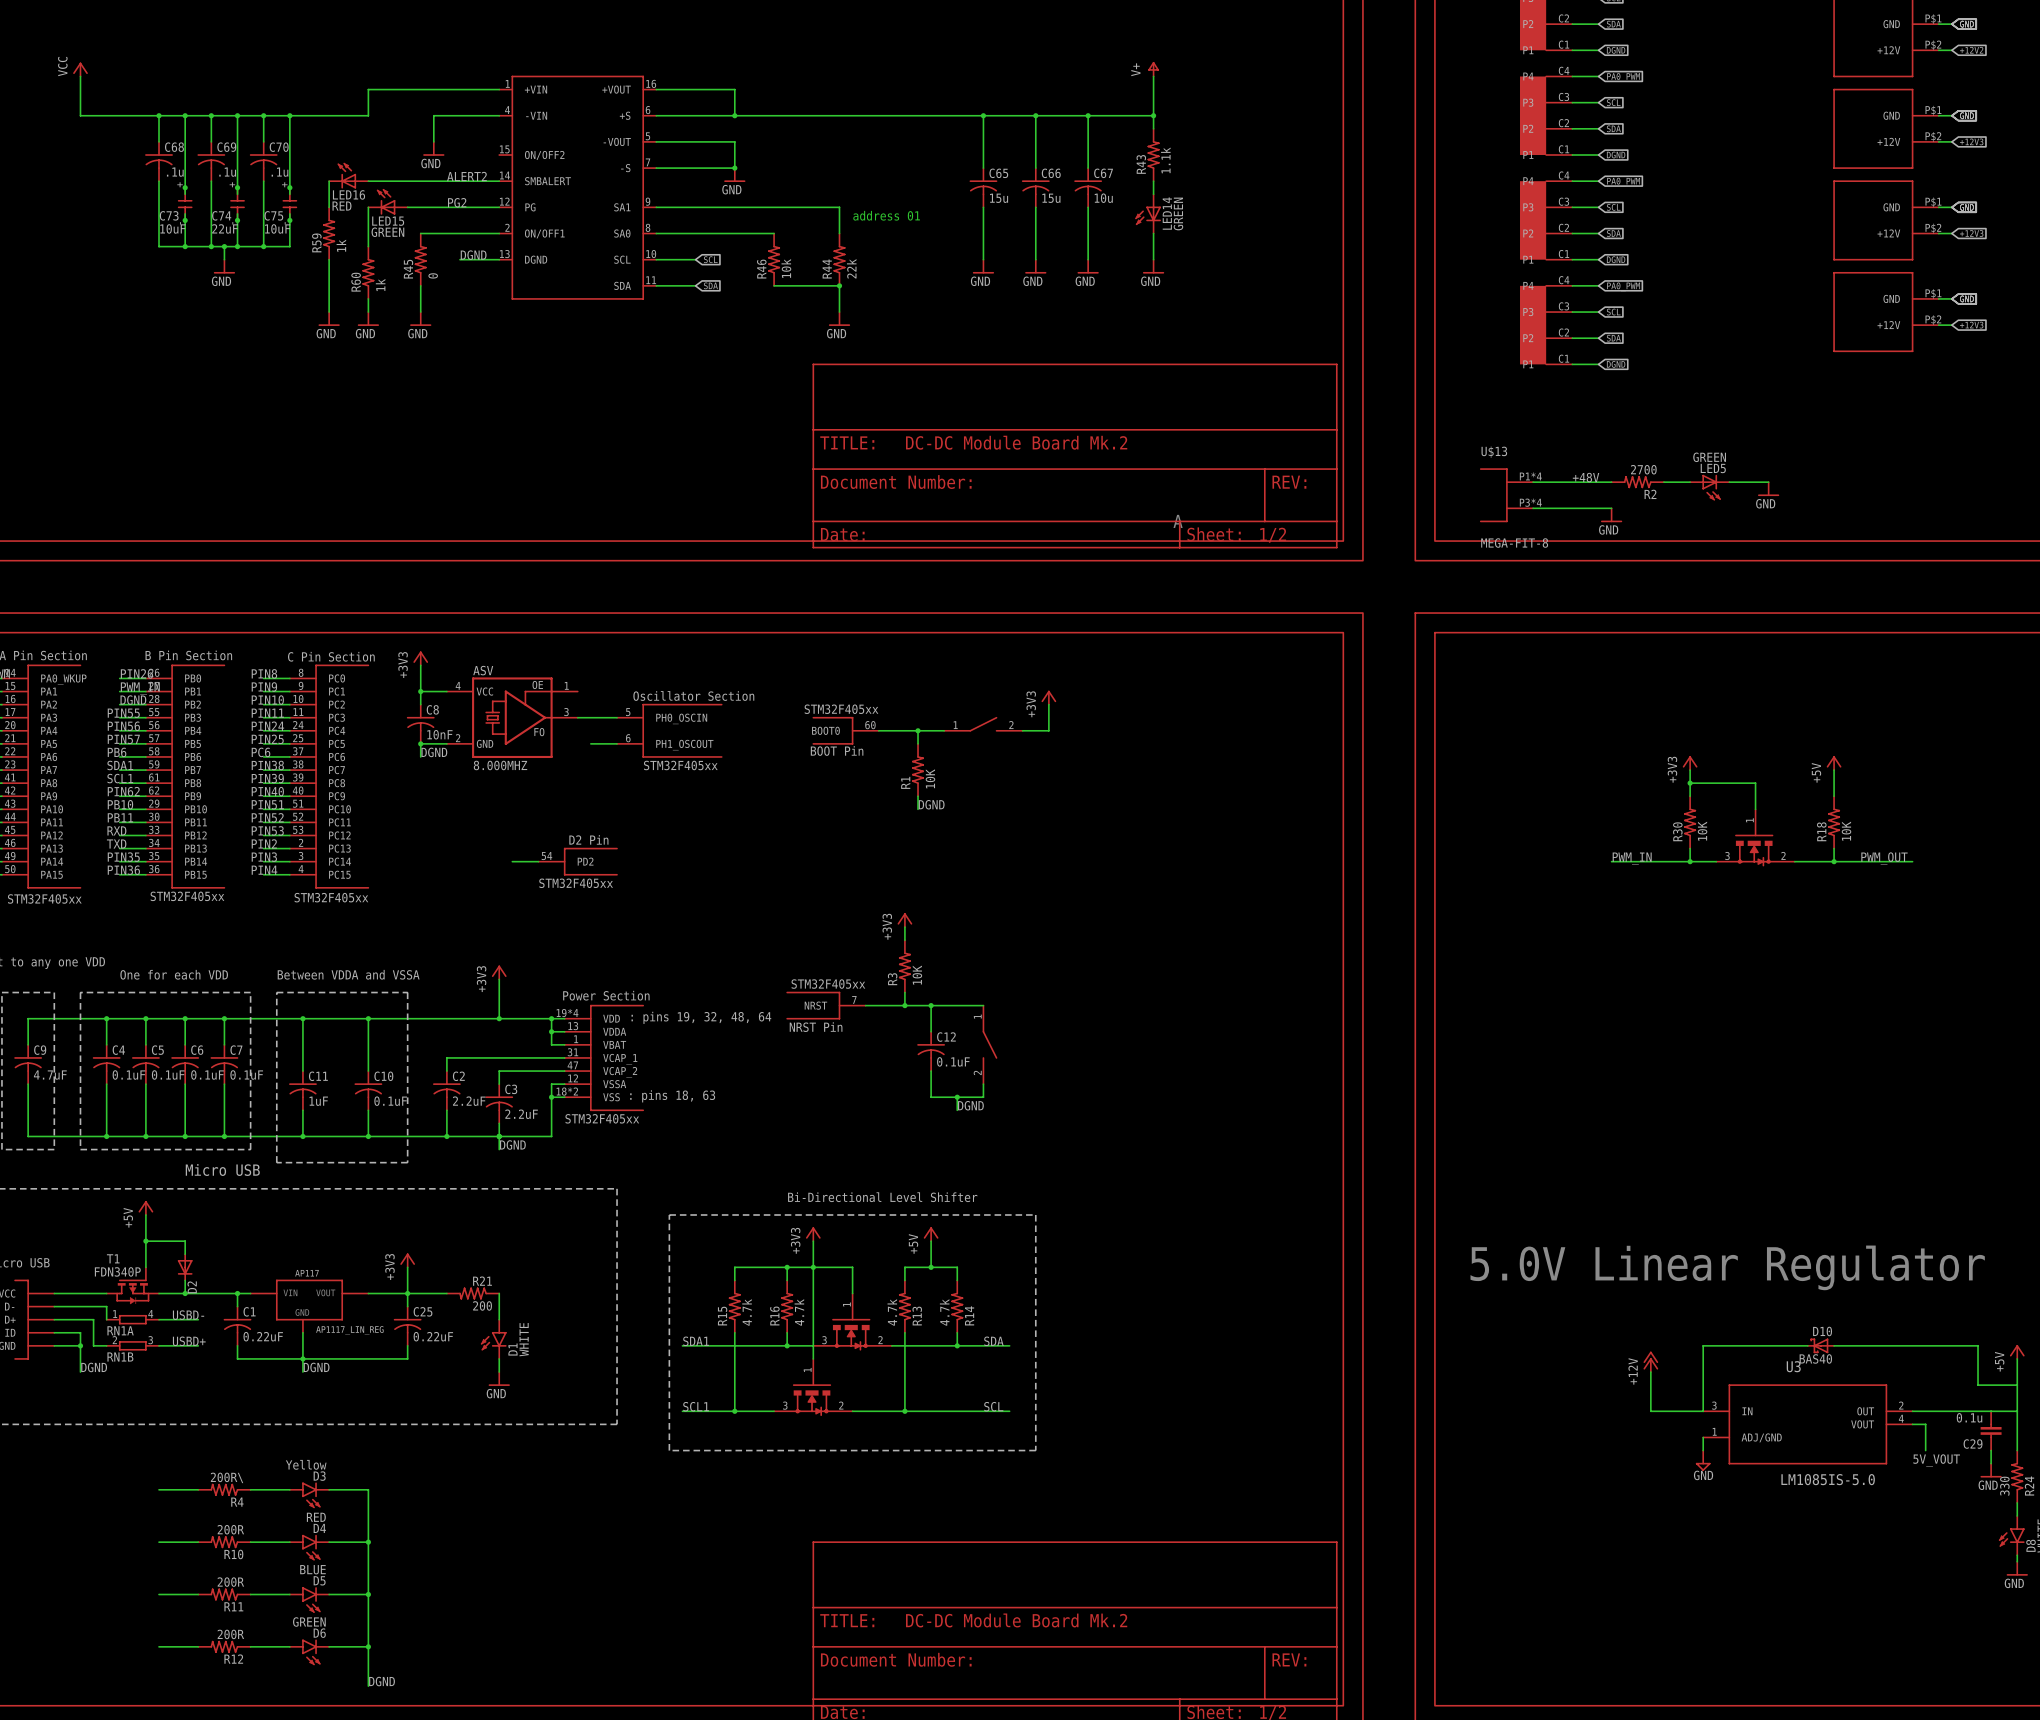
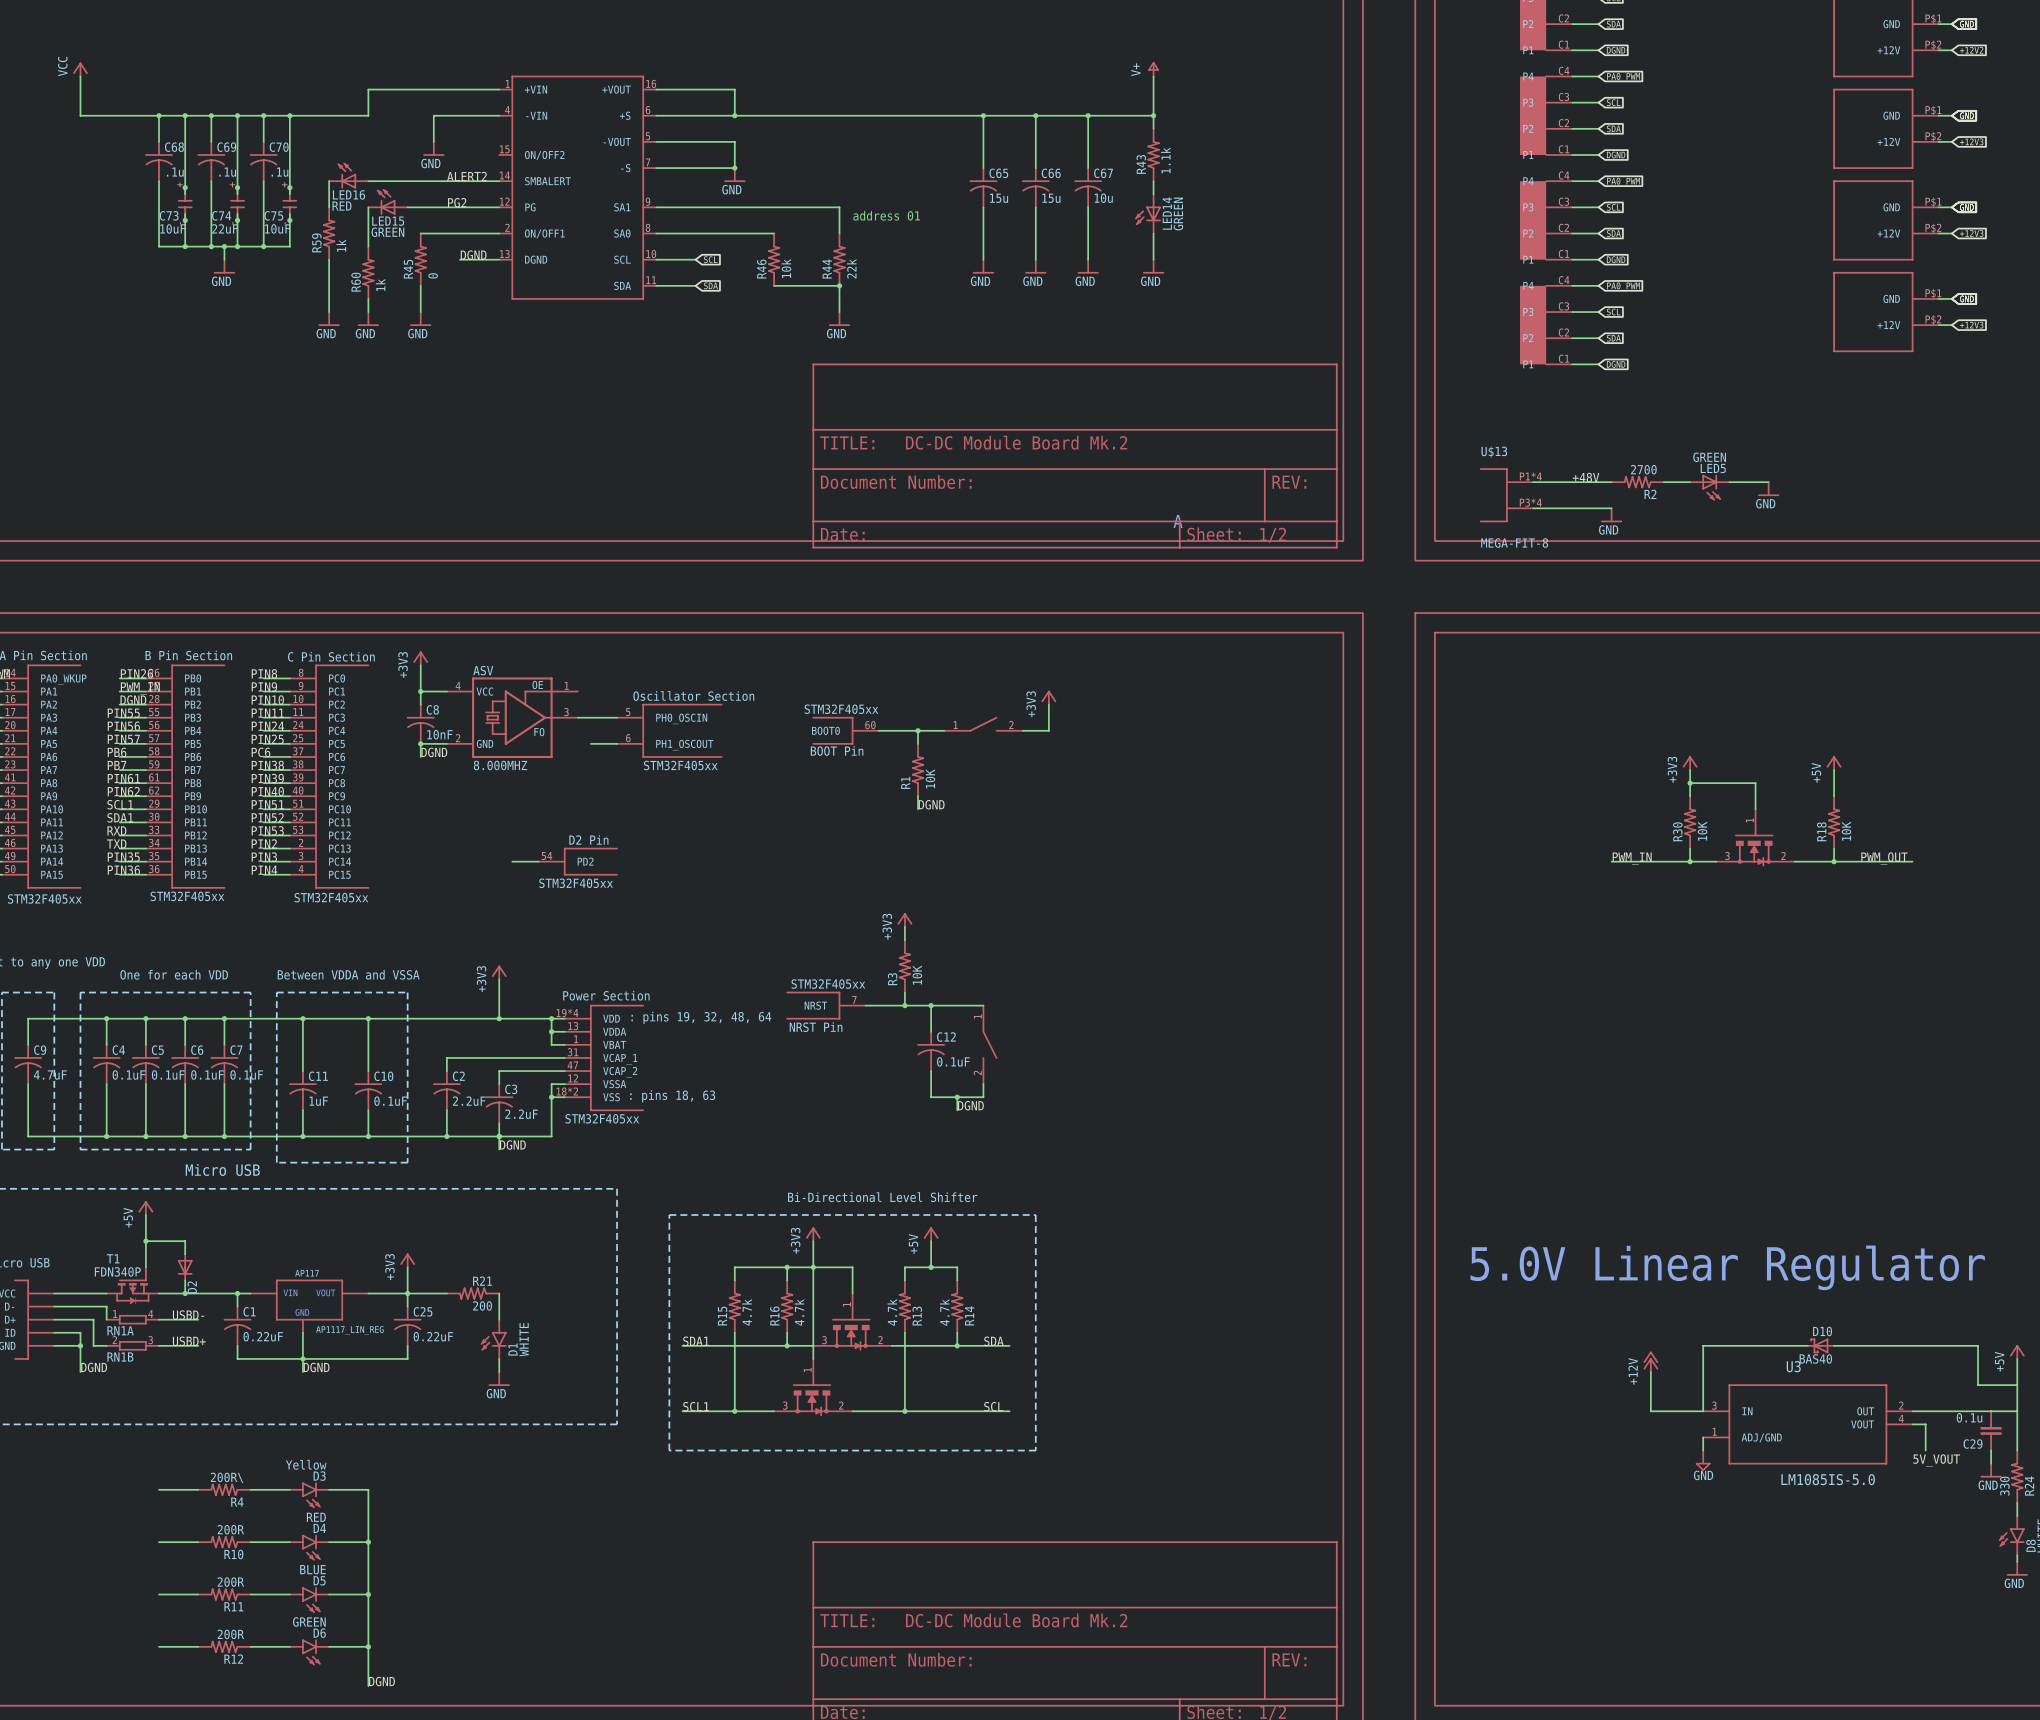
label: SDA1 (120, 765) -> PB7 (116, 765)
label: SCL1 (120, 778) -> PIN61 (123, 778)
label: PB10 (120, 804) -> SCL1 (120, 804)
label: PB11 (120, 817) -> SDA1 (120, 817)

